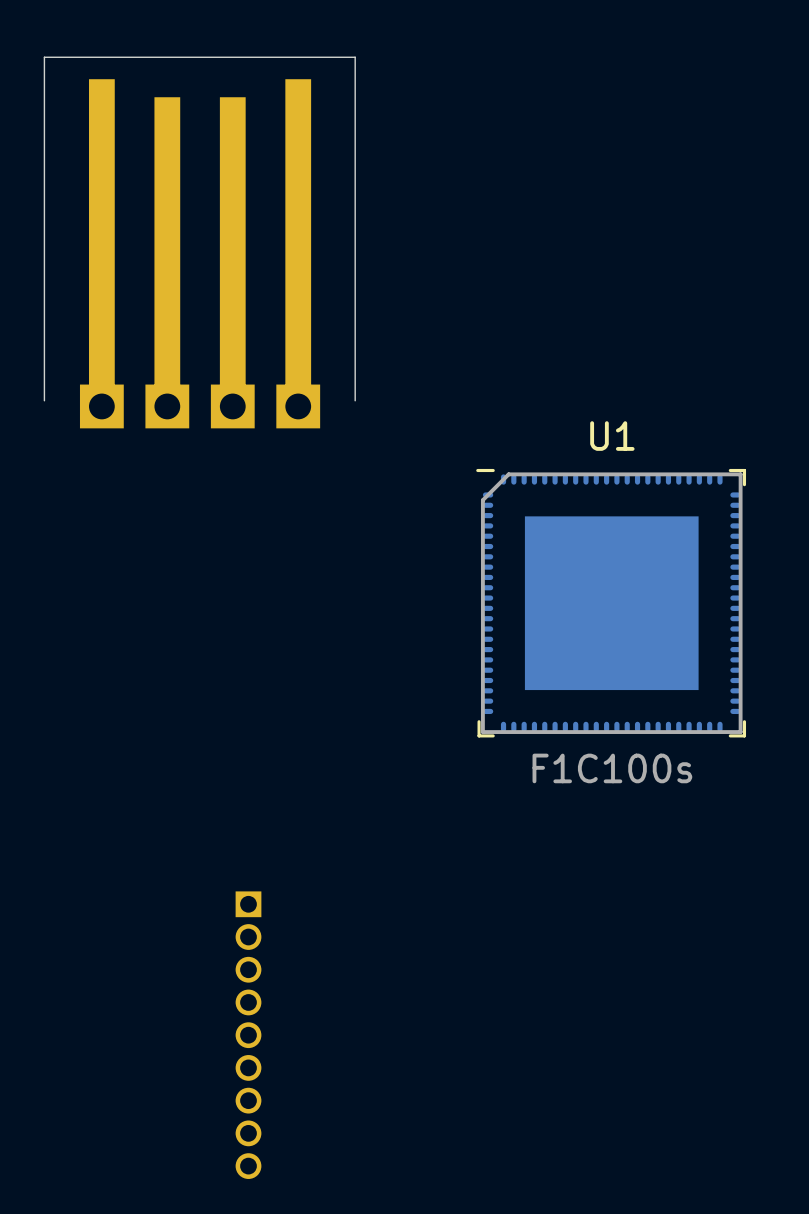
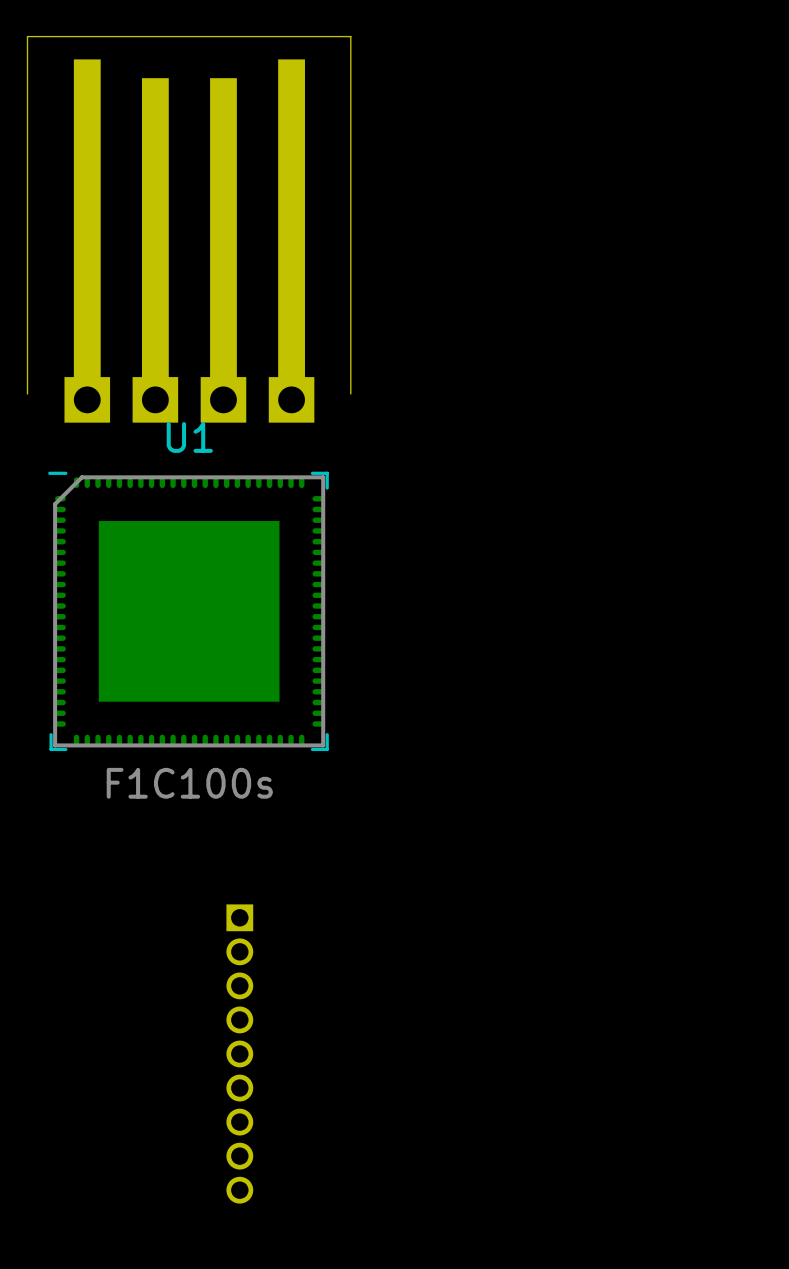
U1 position: (611, 603) -> (188, 611)

